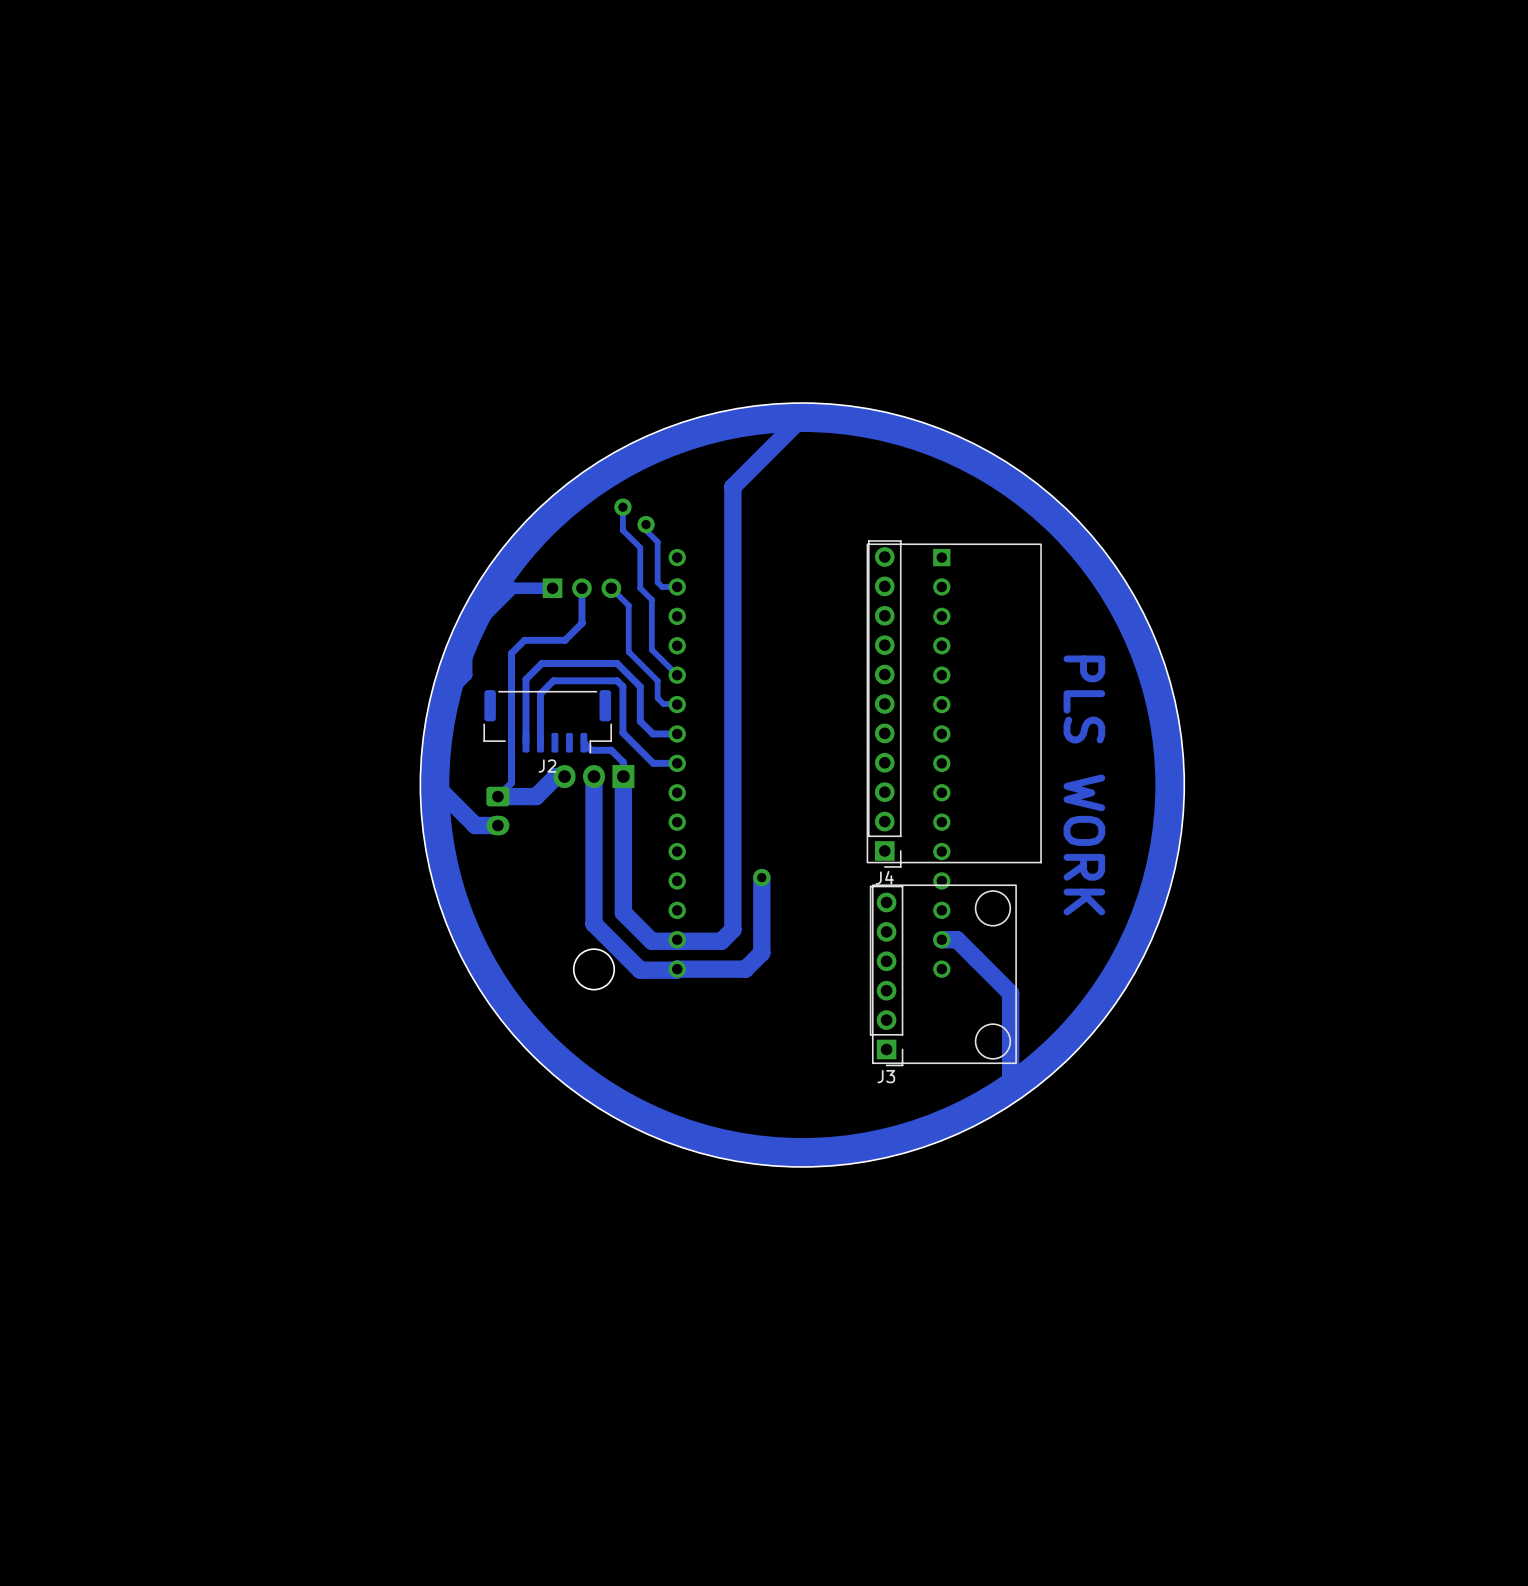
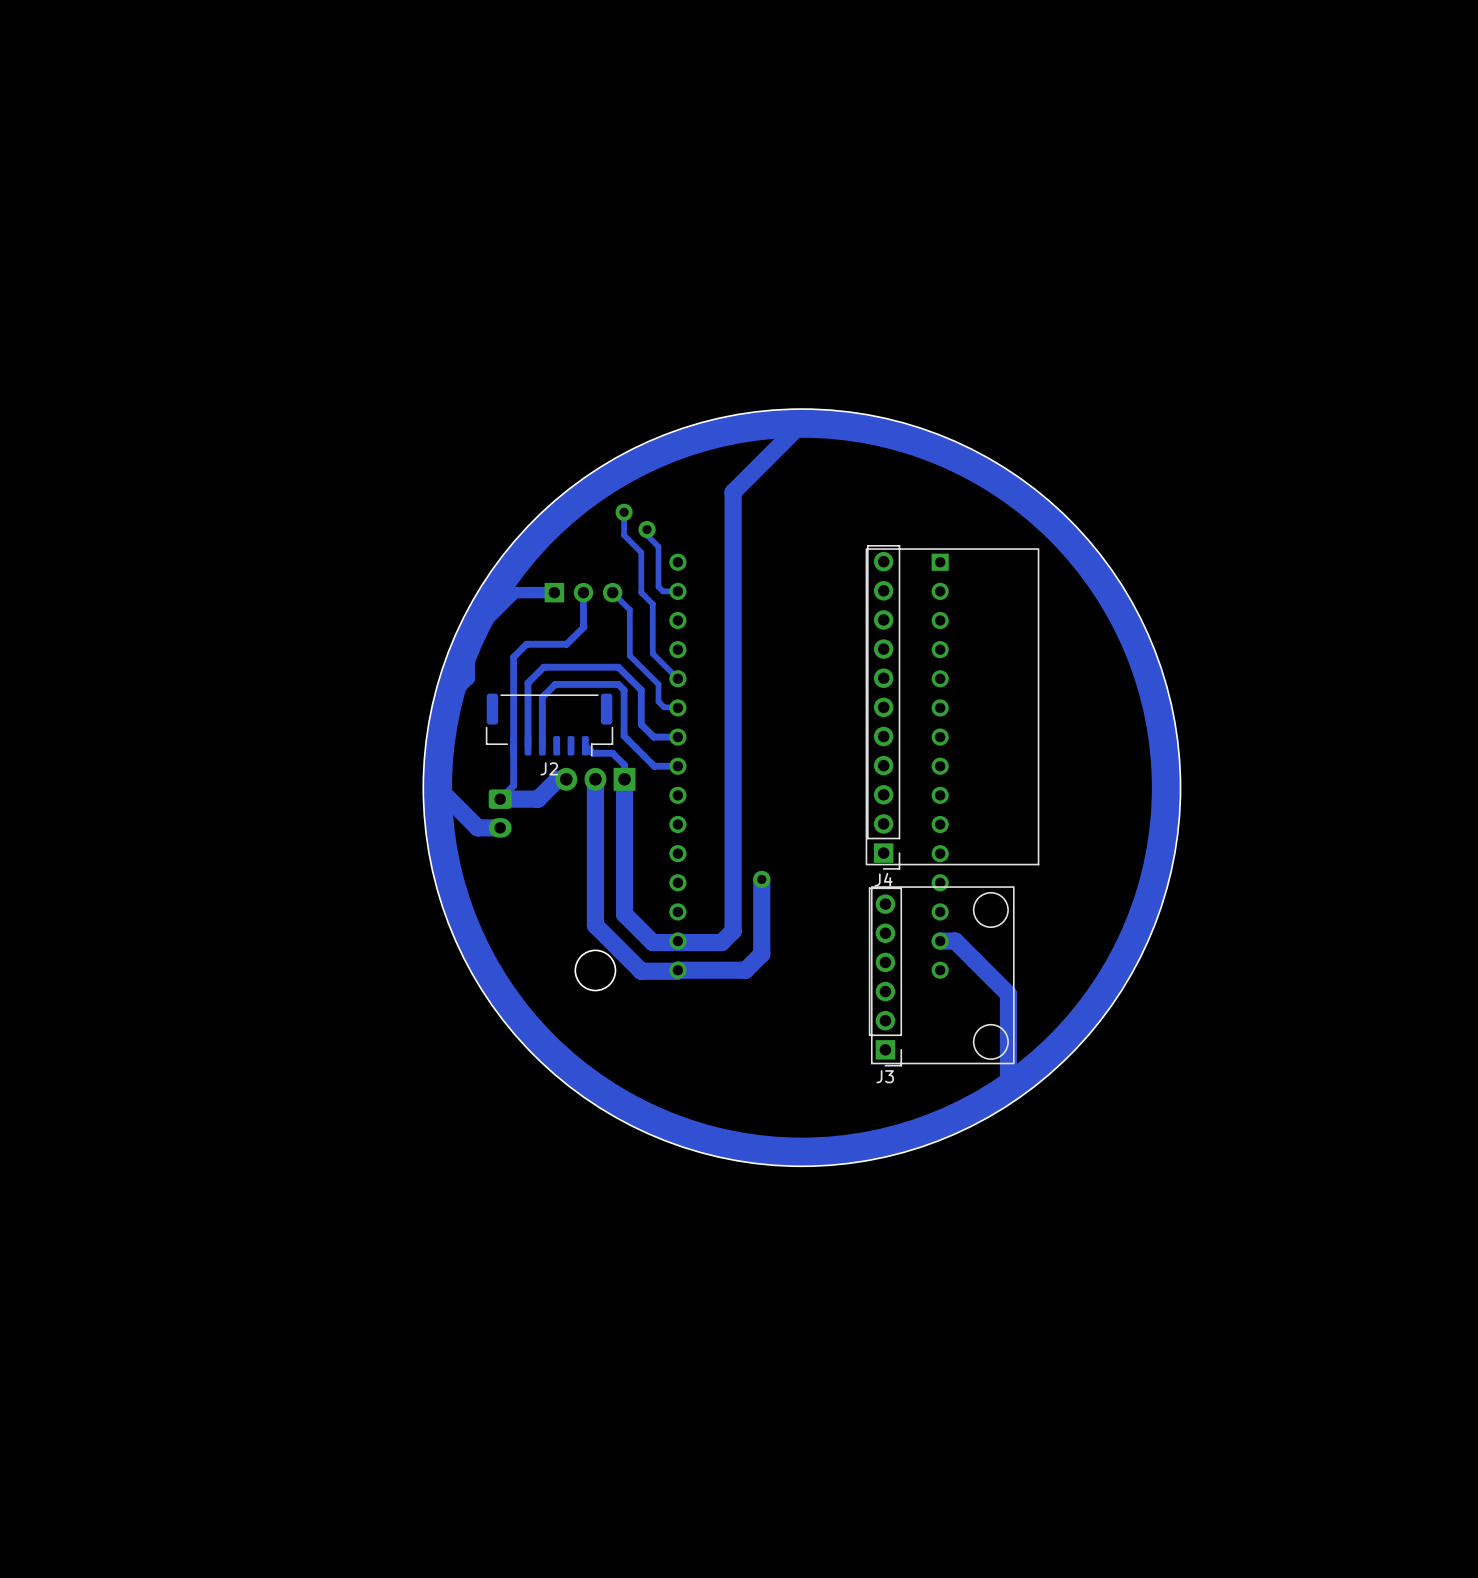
text: PLS WORK (1084, 785) -> none

